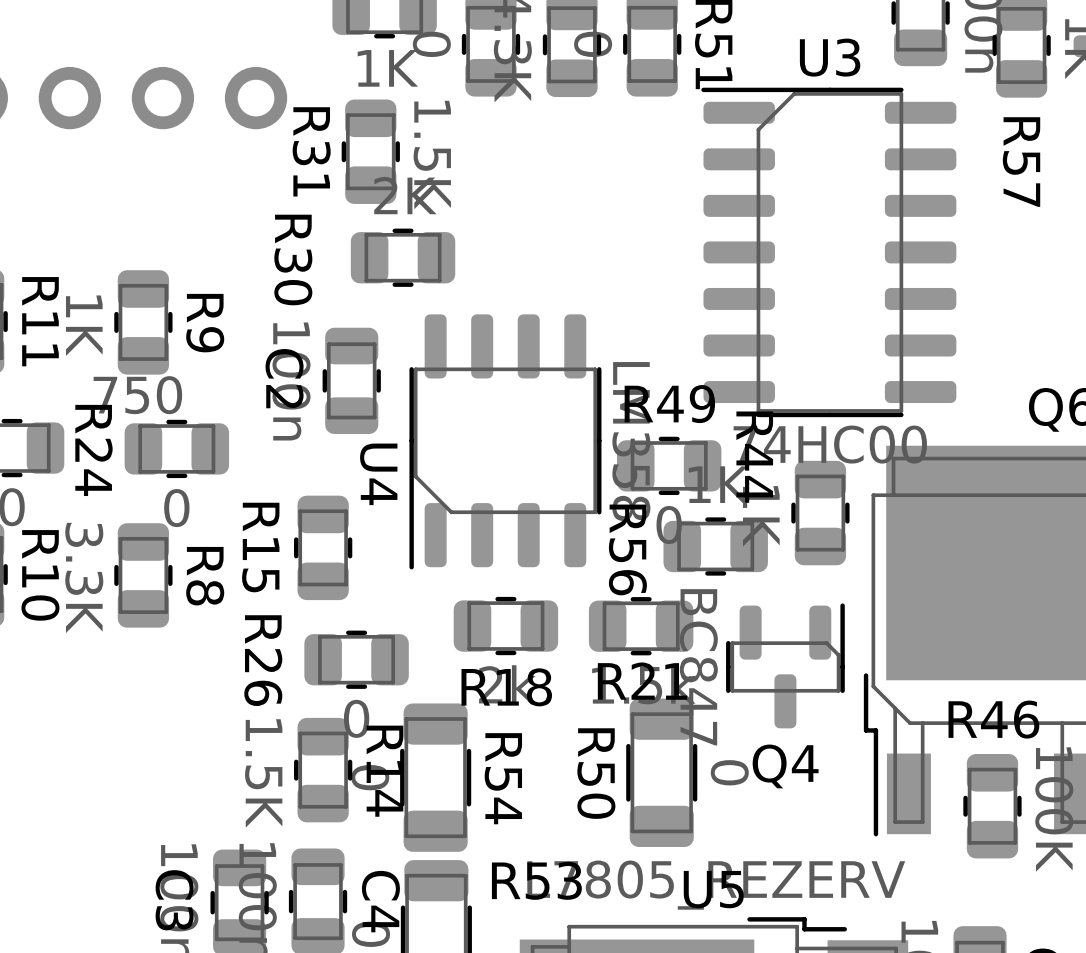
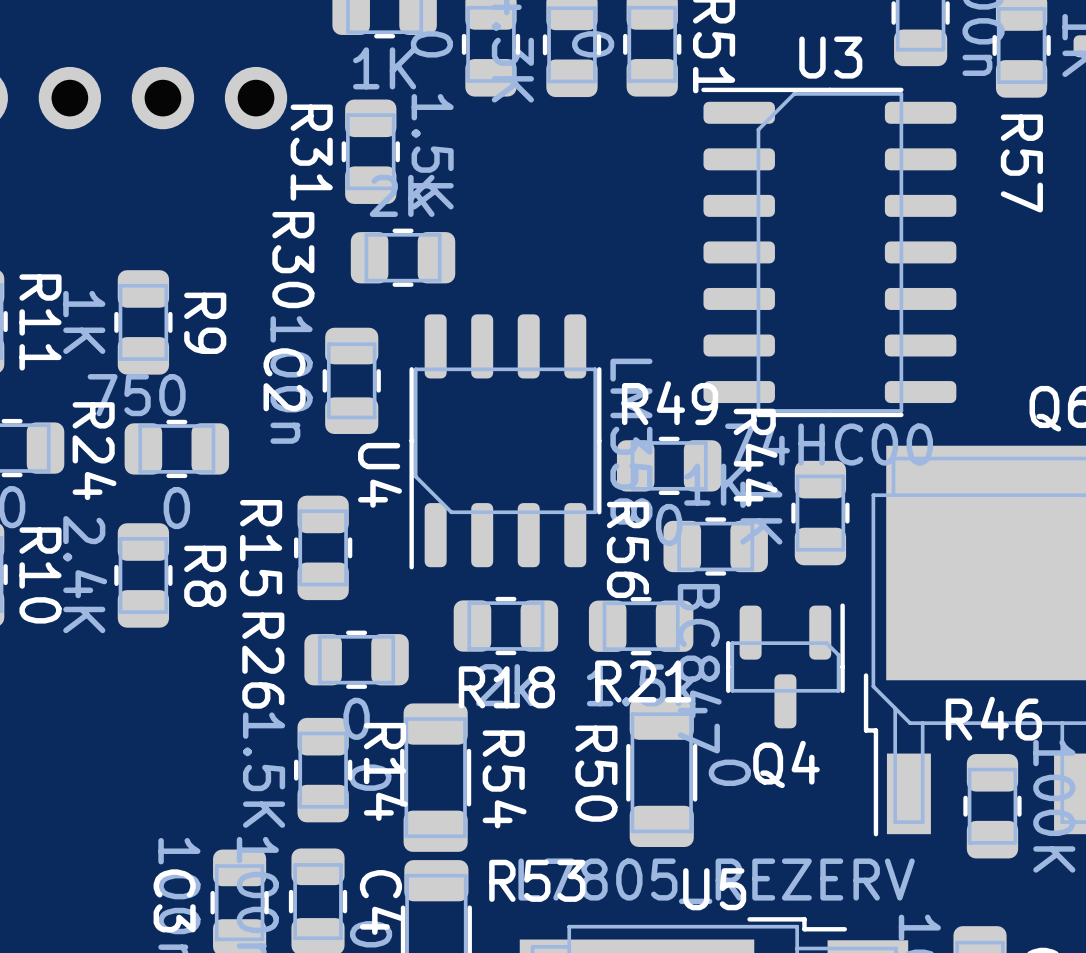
R8 value: 3.3K (84, 577) -> 2.4K (85, 574)

